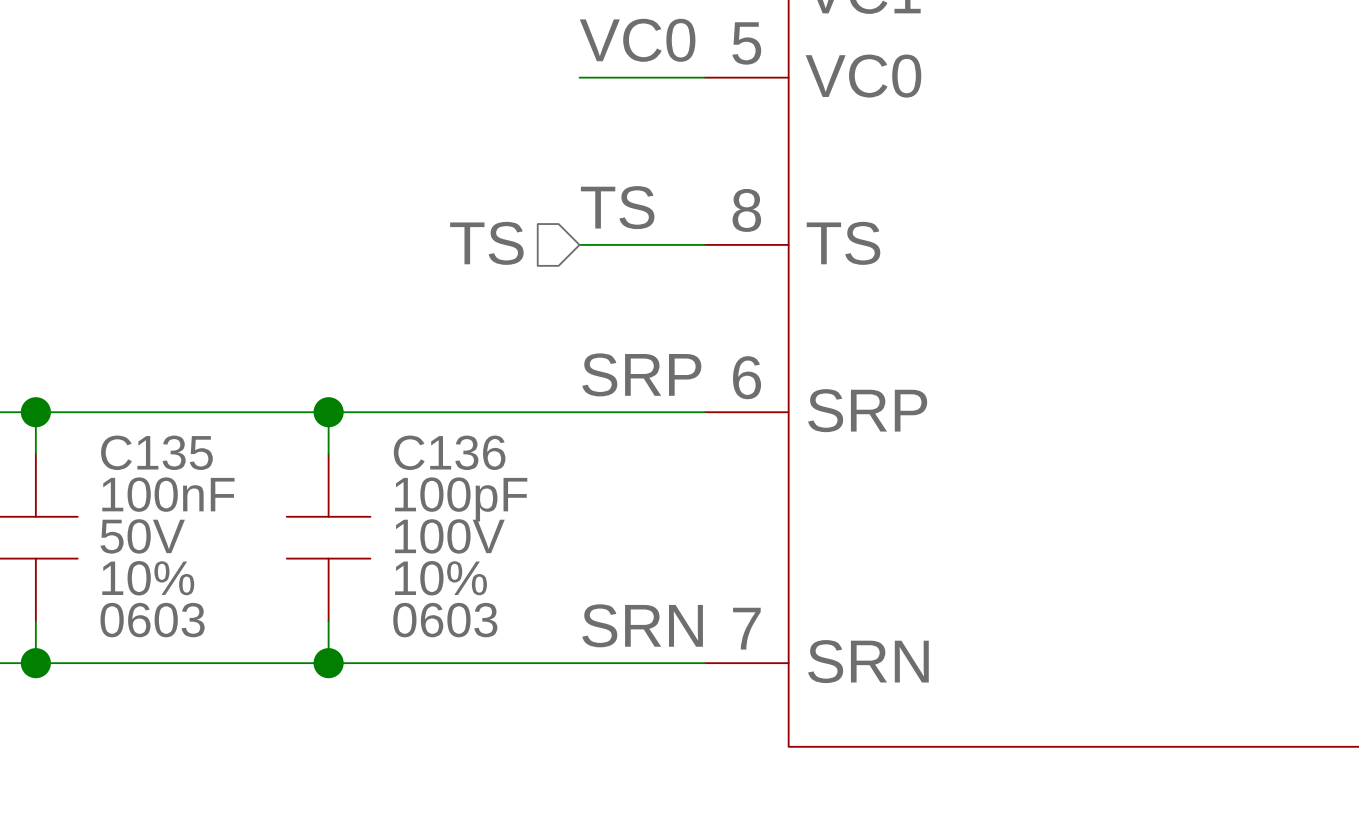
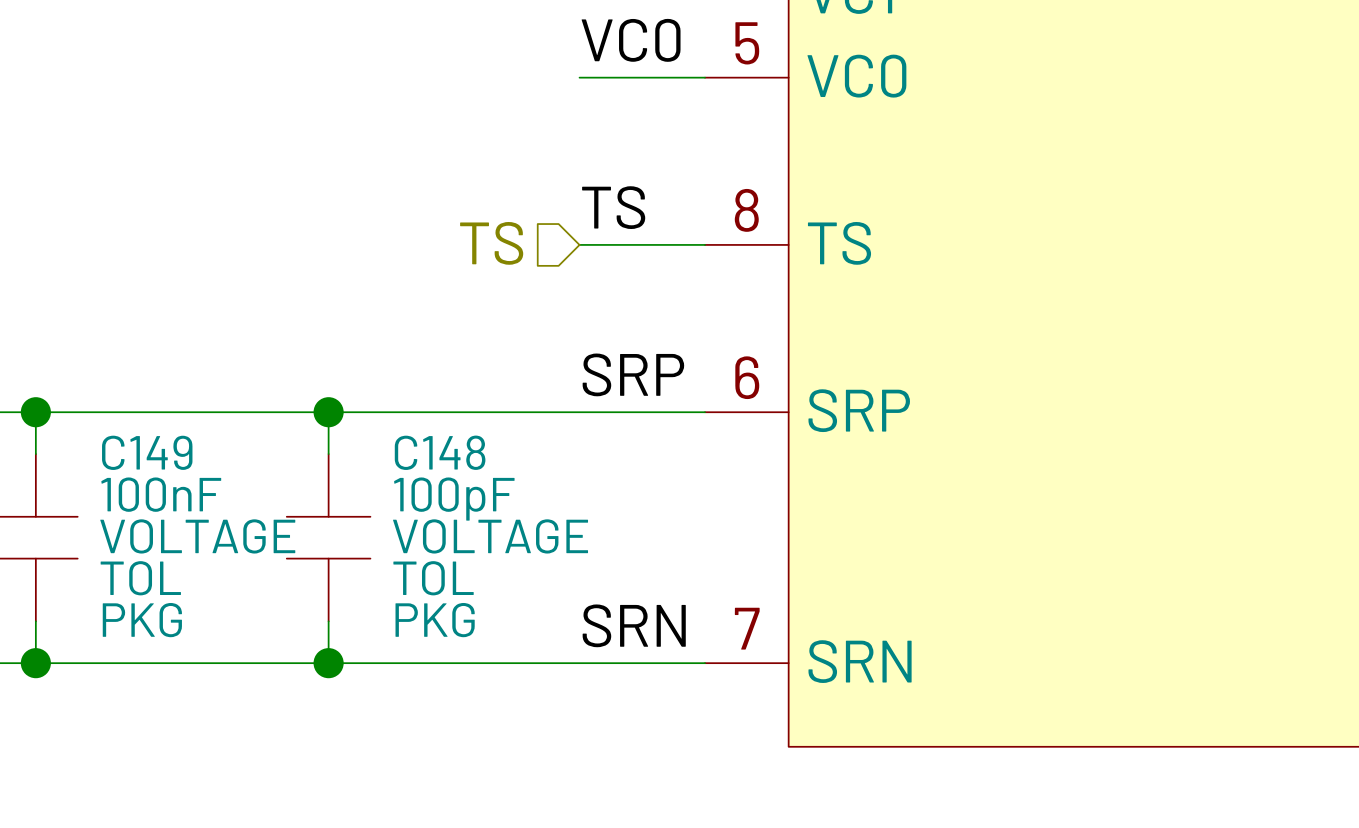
C135 name: C135 (156, 452) -> C149 (147, 452)
C136 name: C136 (449, 452) -> C148 (440, 452)
C135 text: 50V (142, 536) -> VOLTAGE (197, 536)
C136 text: 100V (449, 536) -> VOLTAGE (490, 536)
C135 text: 10% (148, 578) -> TOL (140, 578)
C136 text: 10% (441, 578) -> TOL (433, 578)
C135 text: 0603 (152, 620) -> PKG (142, 620)
C136 text: 0603 (445, 620) -> PKG (435, 620)

